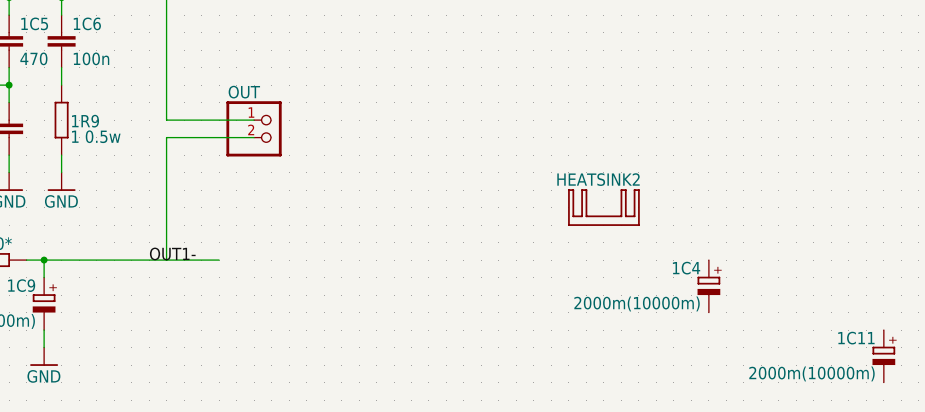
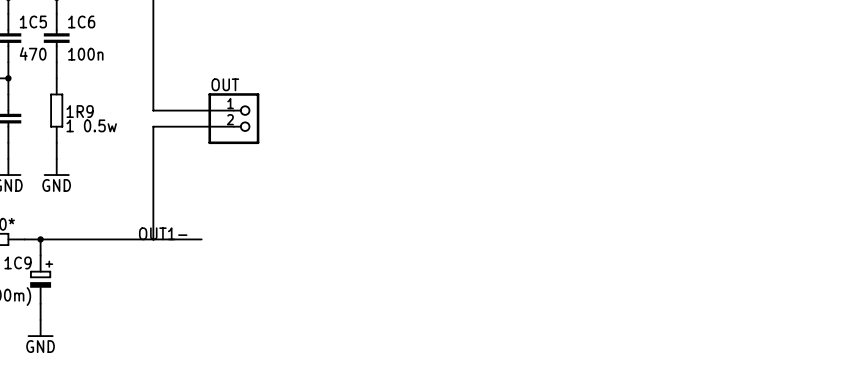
HEATSINK2: (603, 207) -> none
1C4: 2000m(10000m) (708, 286) -> none
1C11: 2000m(10000m) (883, 356) -> none

